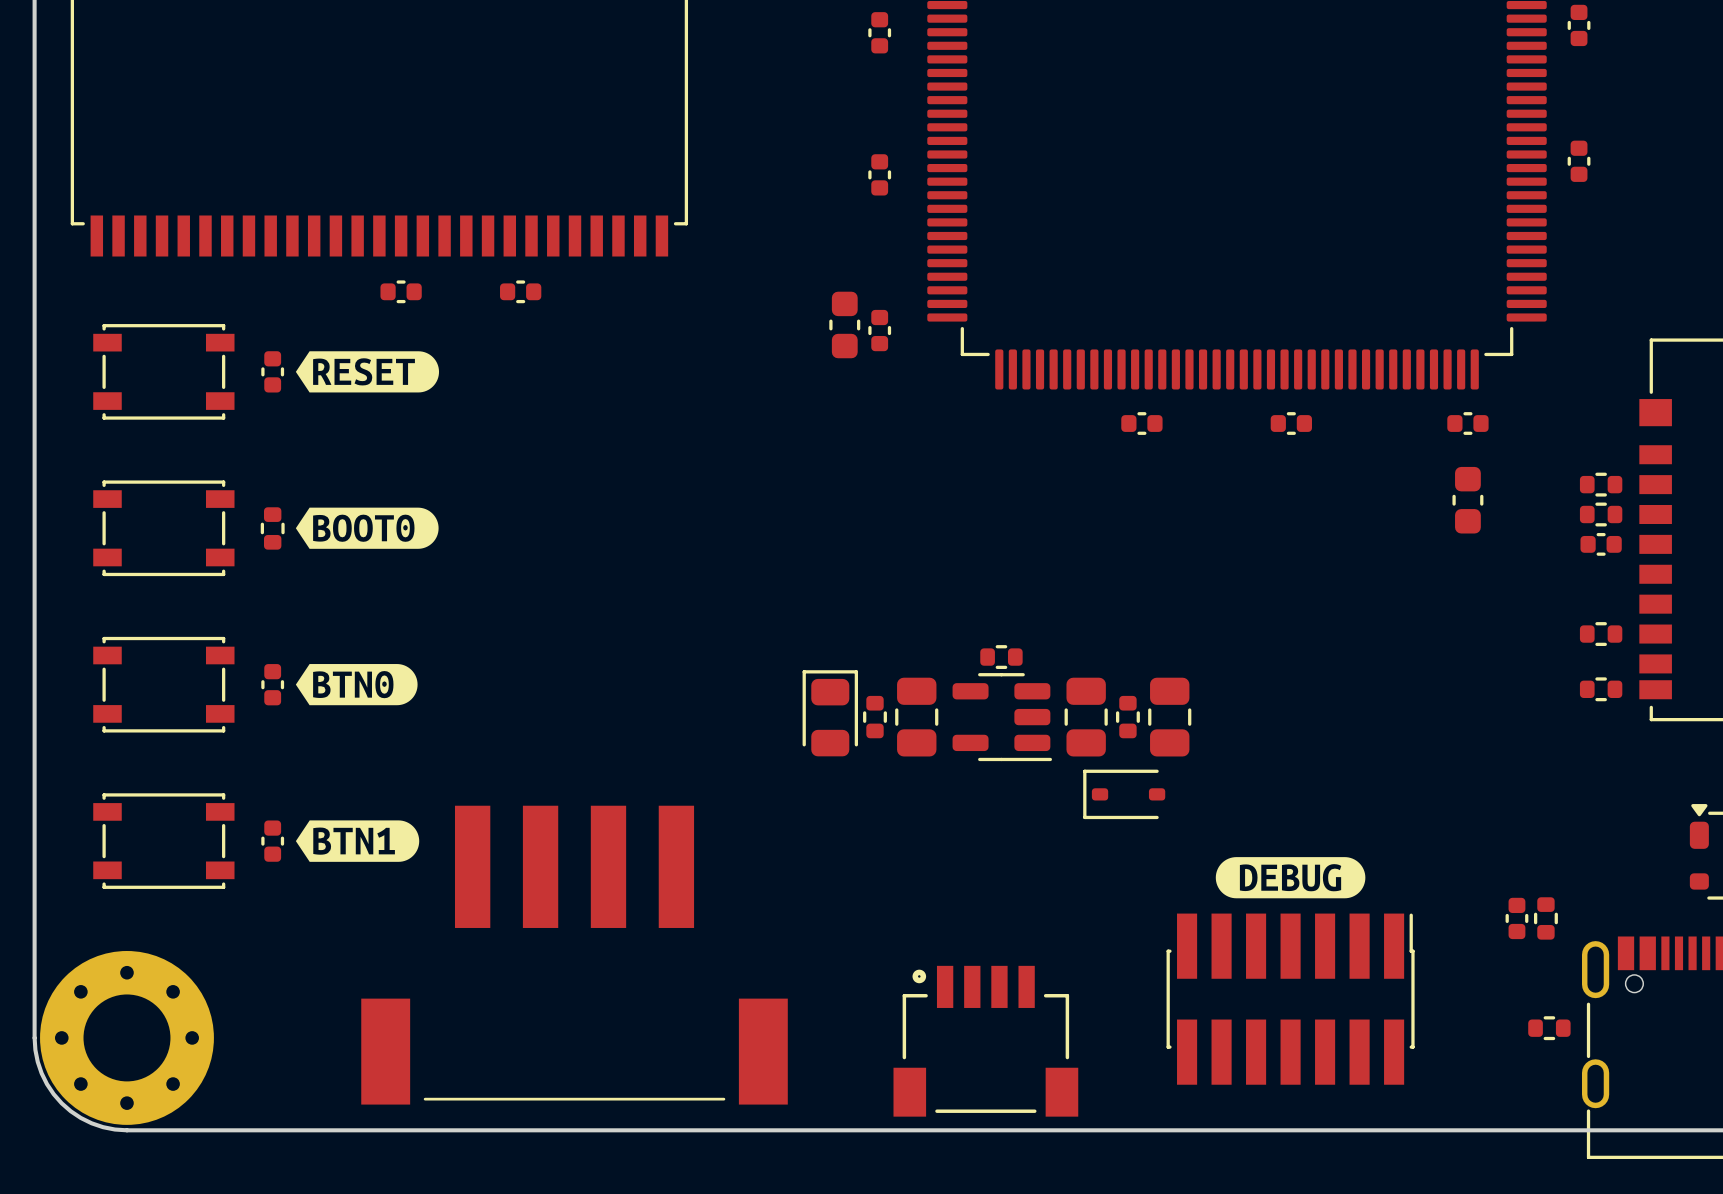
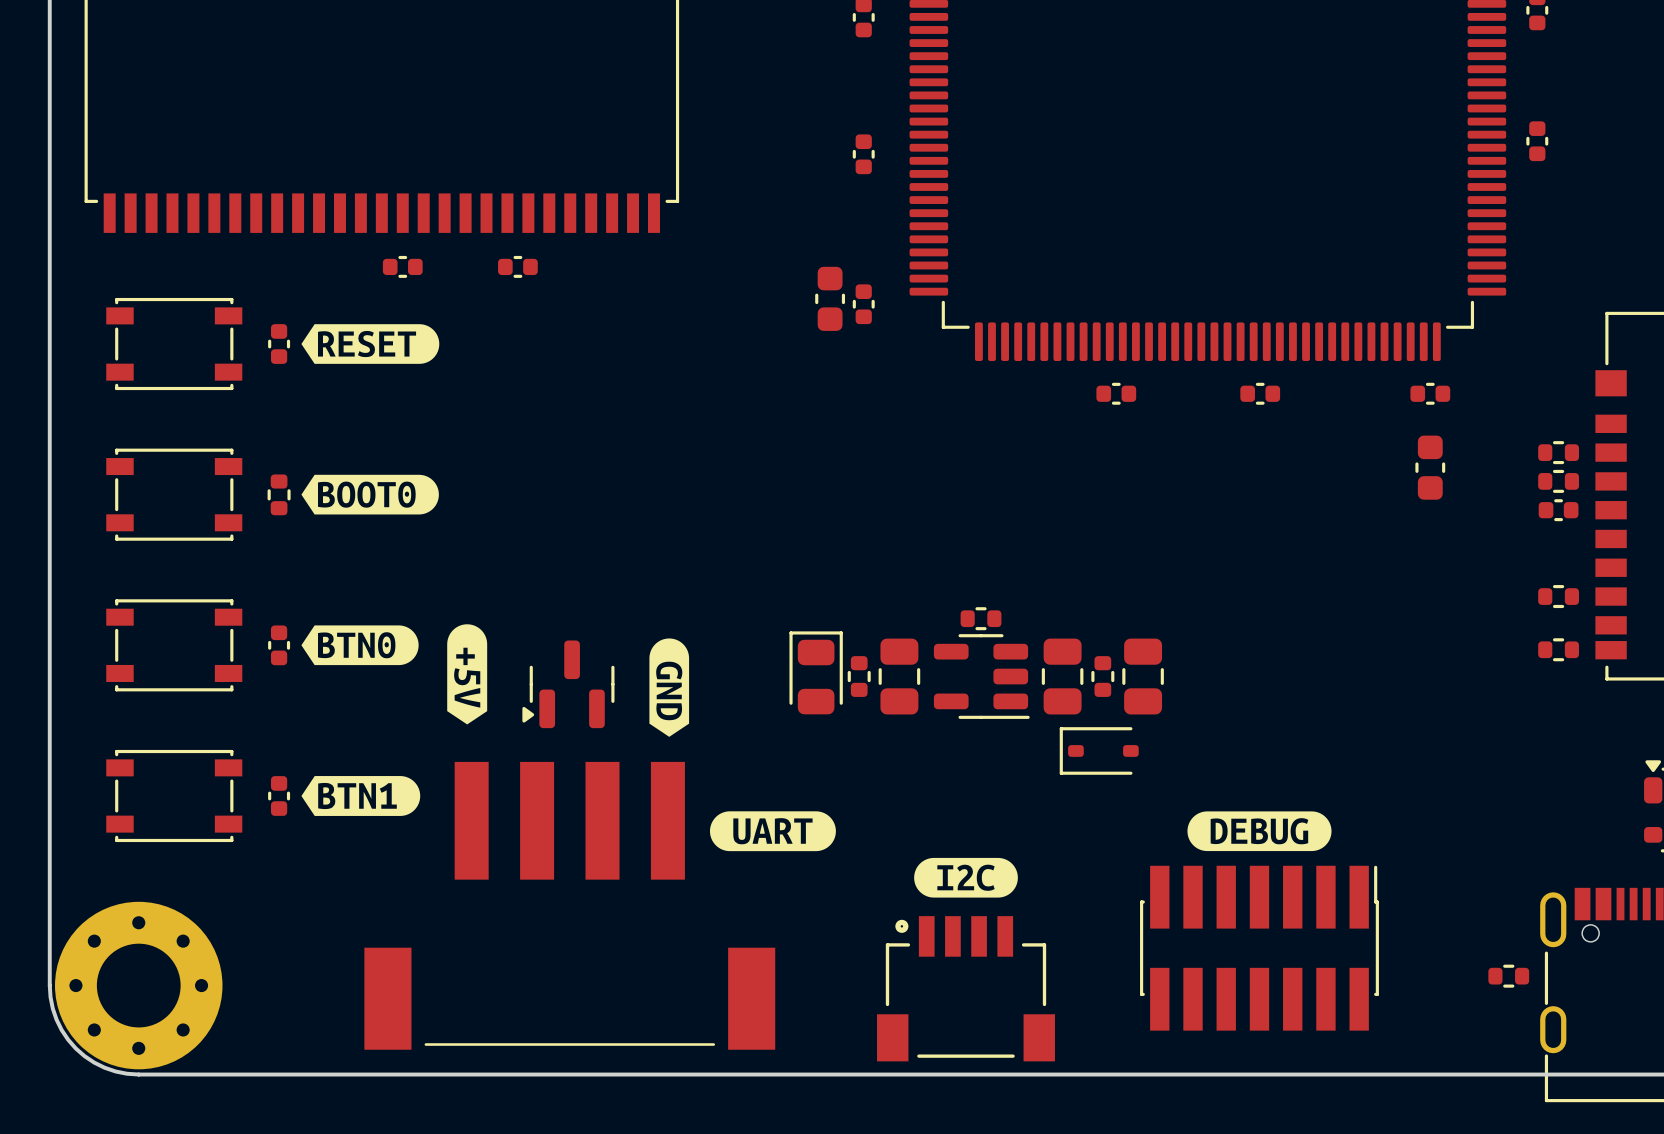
drawing: none -> [447, 624, 488, 725]
drawing: none -> [649, 638, 690, 737]
part: none -> (568, 684)
drawing: none -> [709, 811, 836, 852]
drawing: none -> [914, 857, 1018, 898]
part: (1516, 918) -> none
part: (1545, 918) -> none

